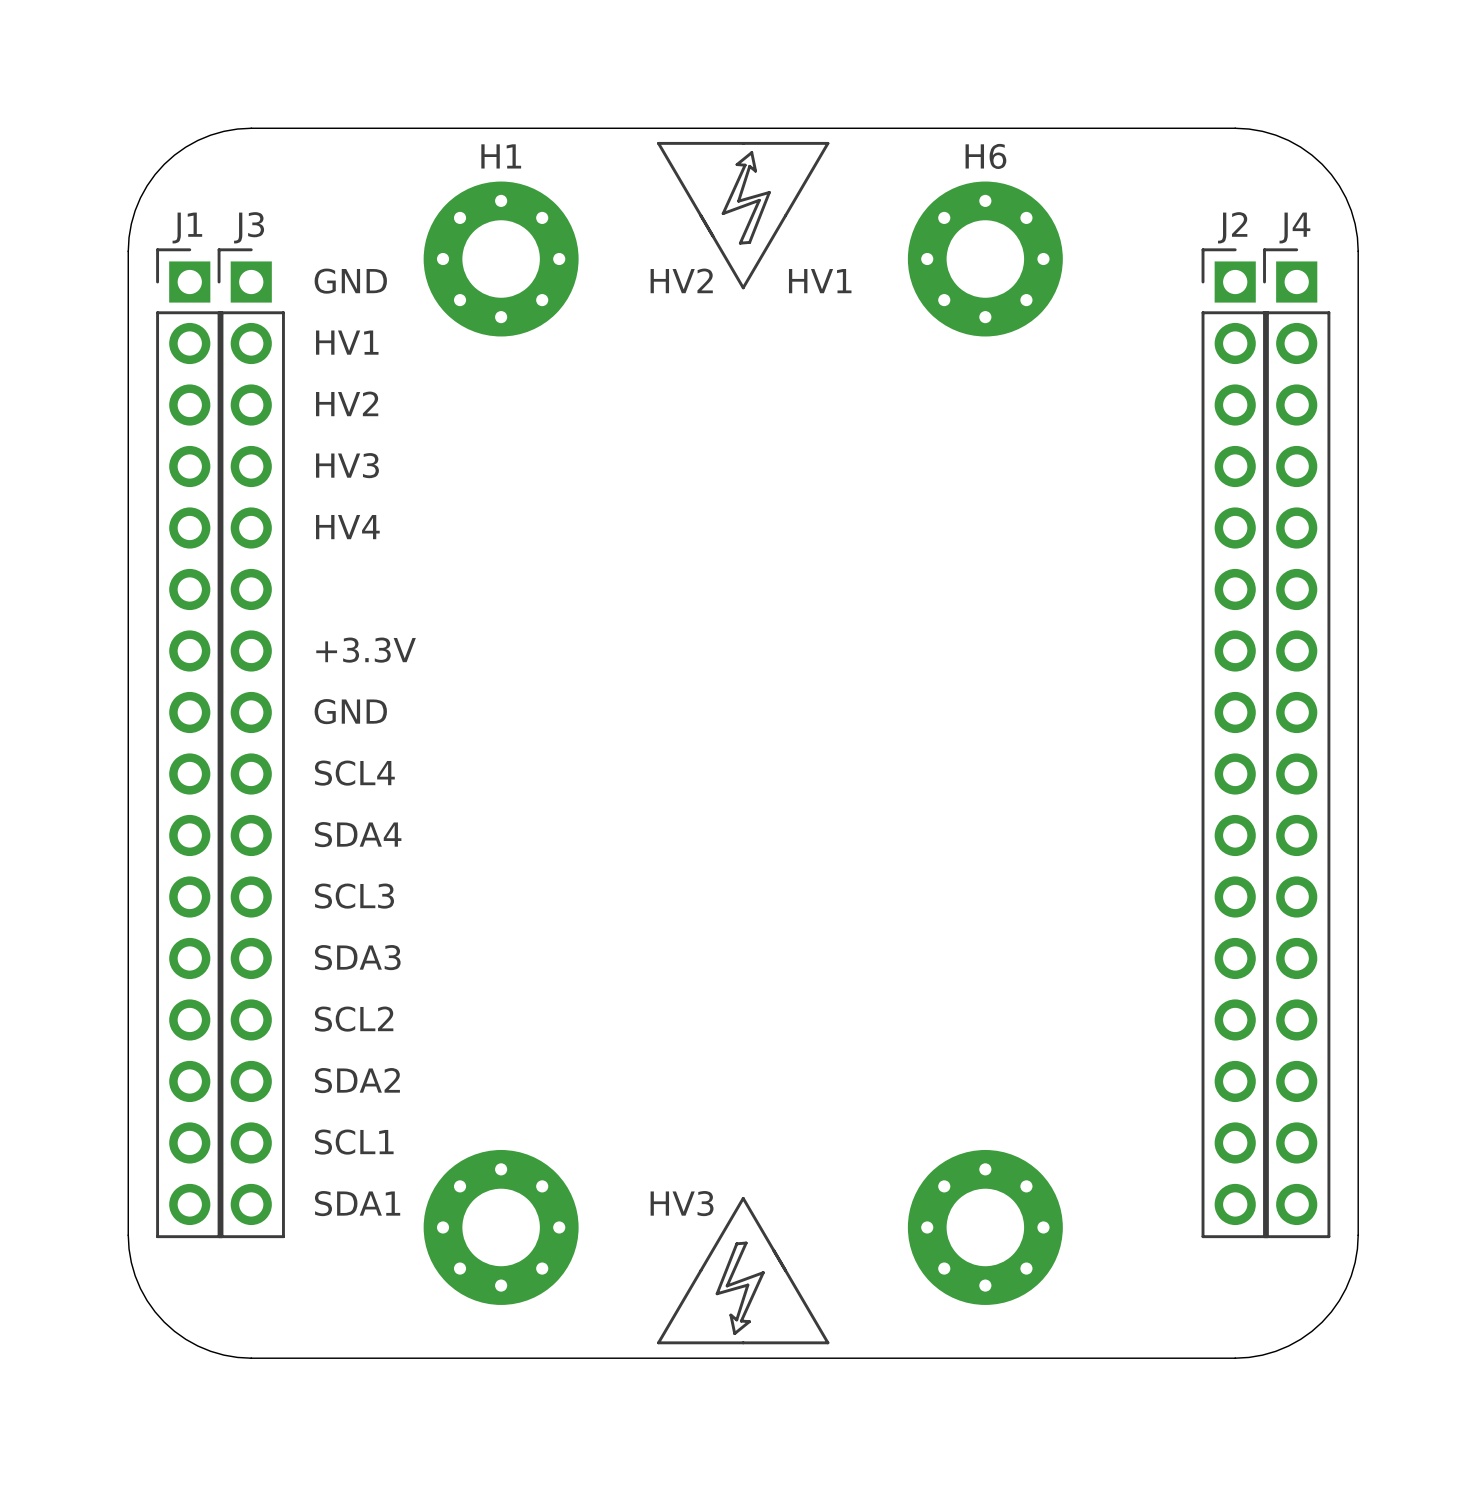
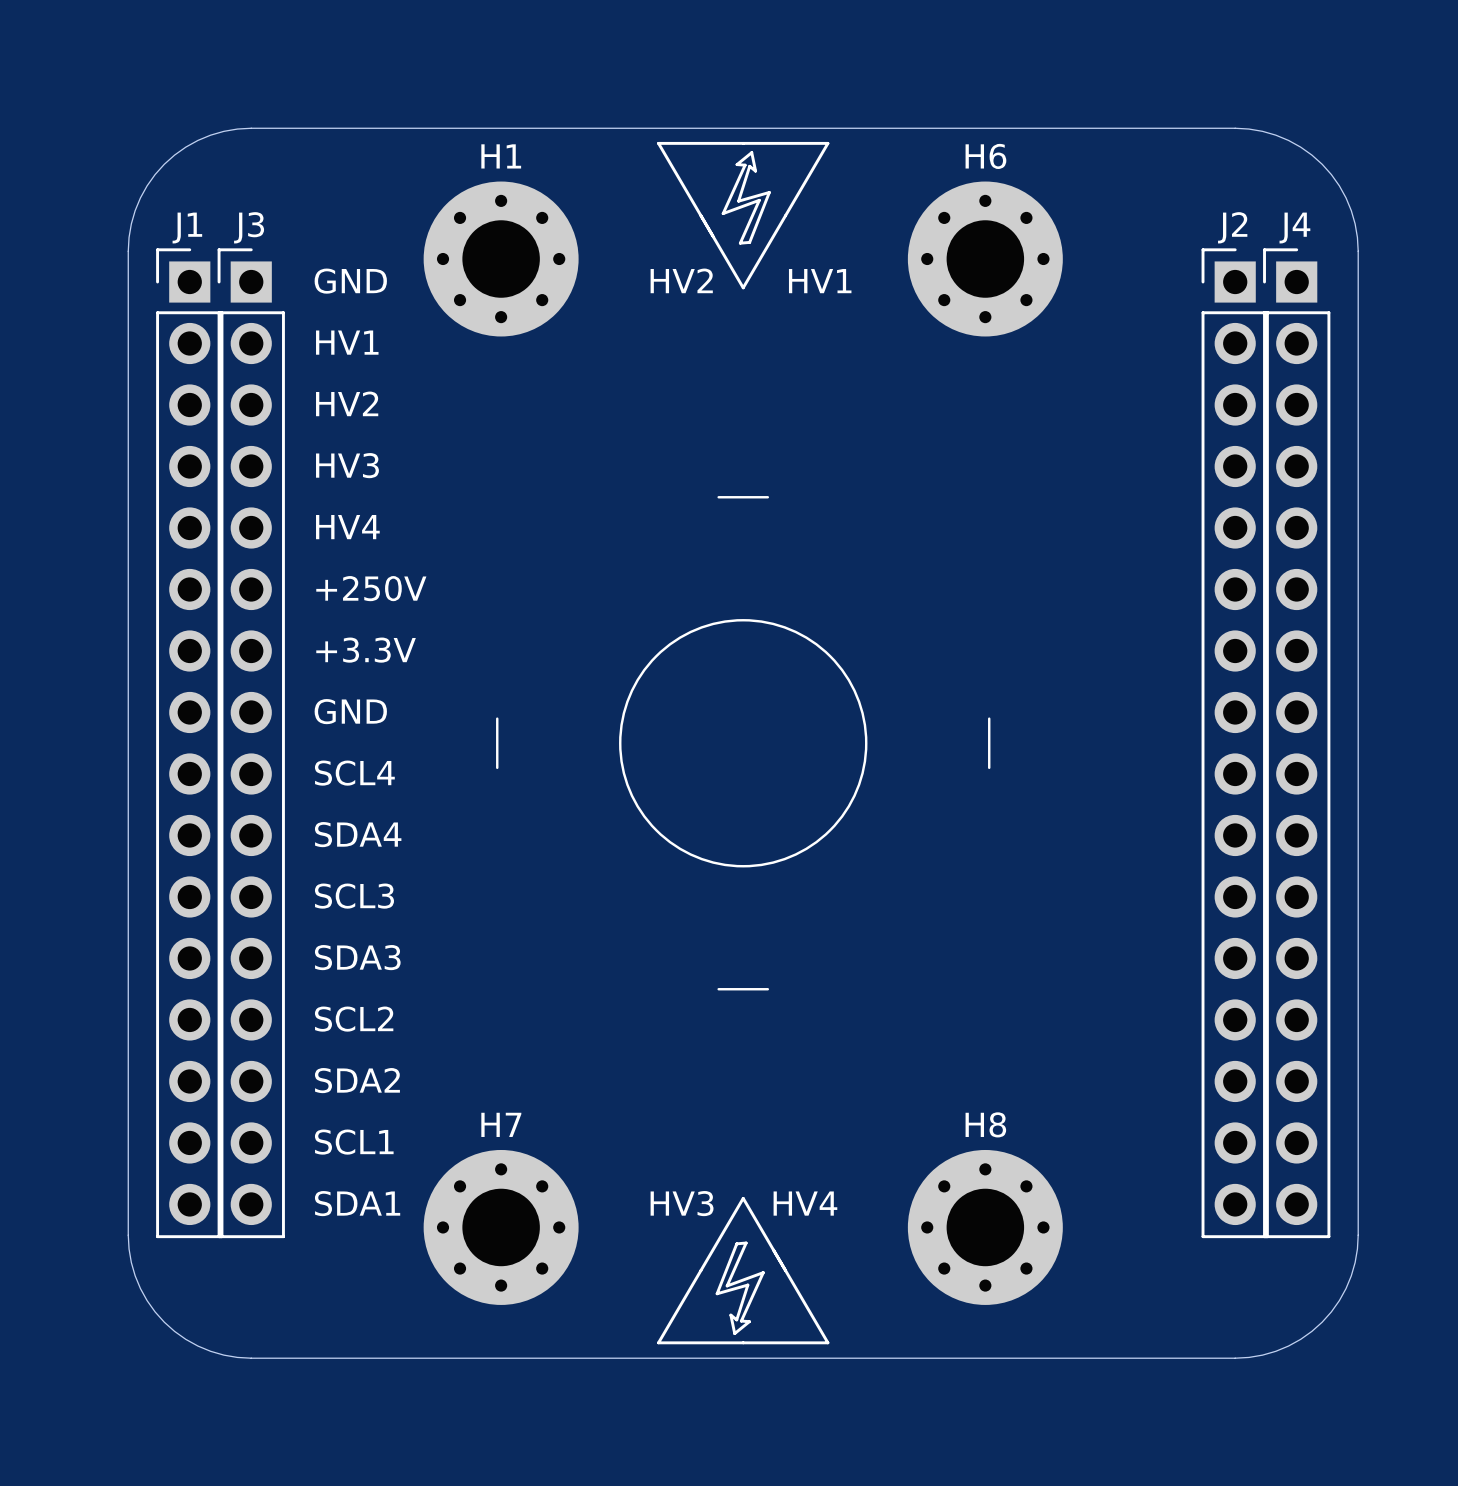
line: none -> (718, 497) (767, 497)
text: none -> +250V (371, 588)
drawing: none -> [619, 619, 868, 868]
line: none -> (497, 718) (497, 767)
line: none -> (989, 718) (989, 767)
line: none -> (718, 989) (767, 989)
H7 name: none -> H7 (501, 1124)
H8 name: none -> H8 (985, 1124)
text: none -> HV4 (805, 1203)

